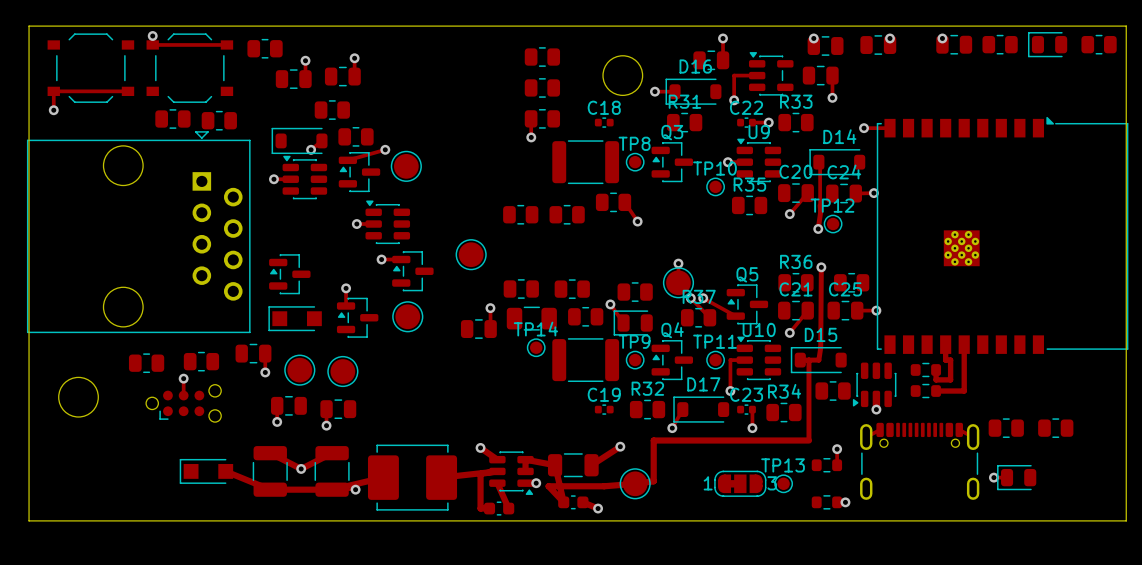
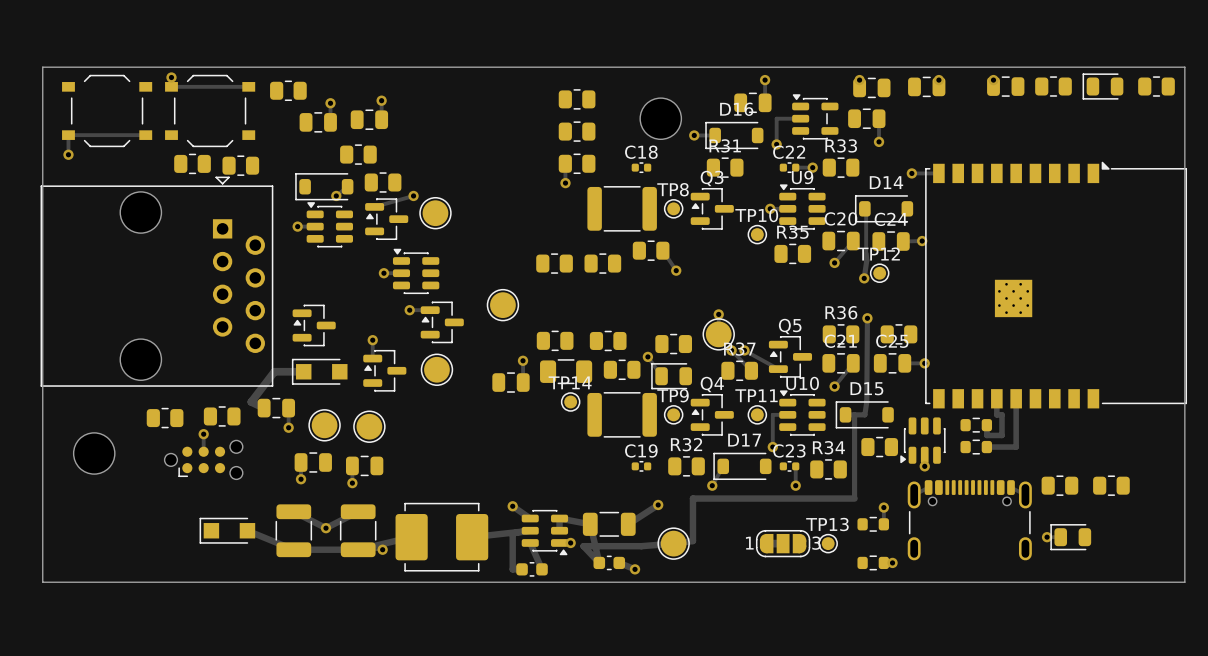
track: none -> (303, 371) (274, 371) (251, 401) (264, 408)

